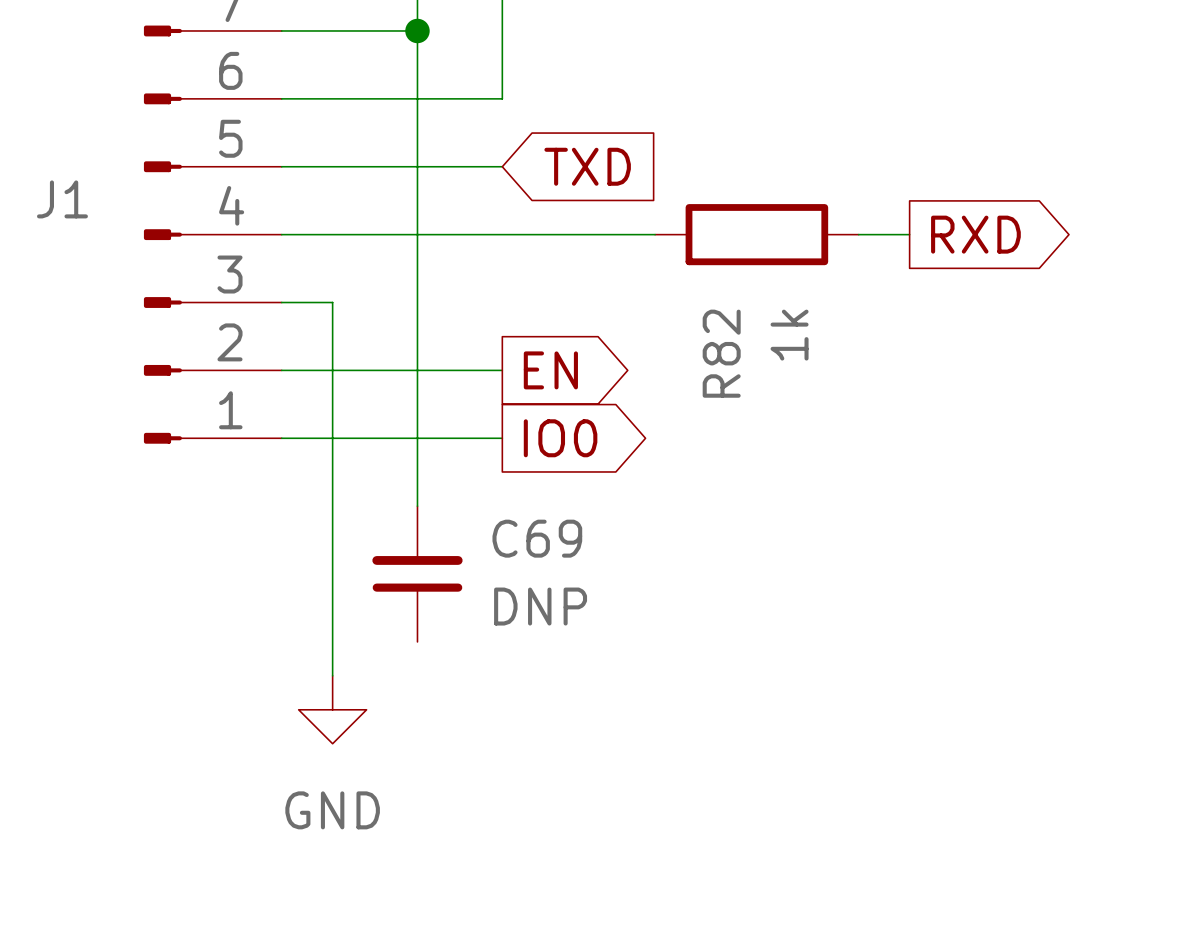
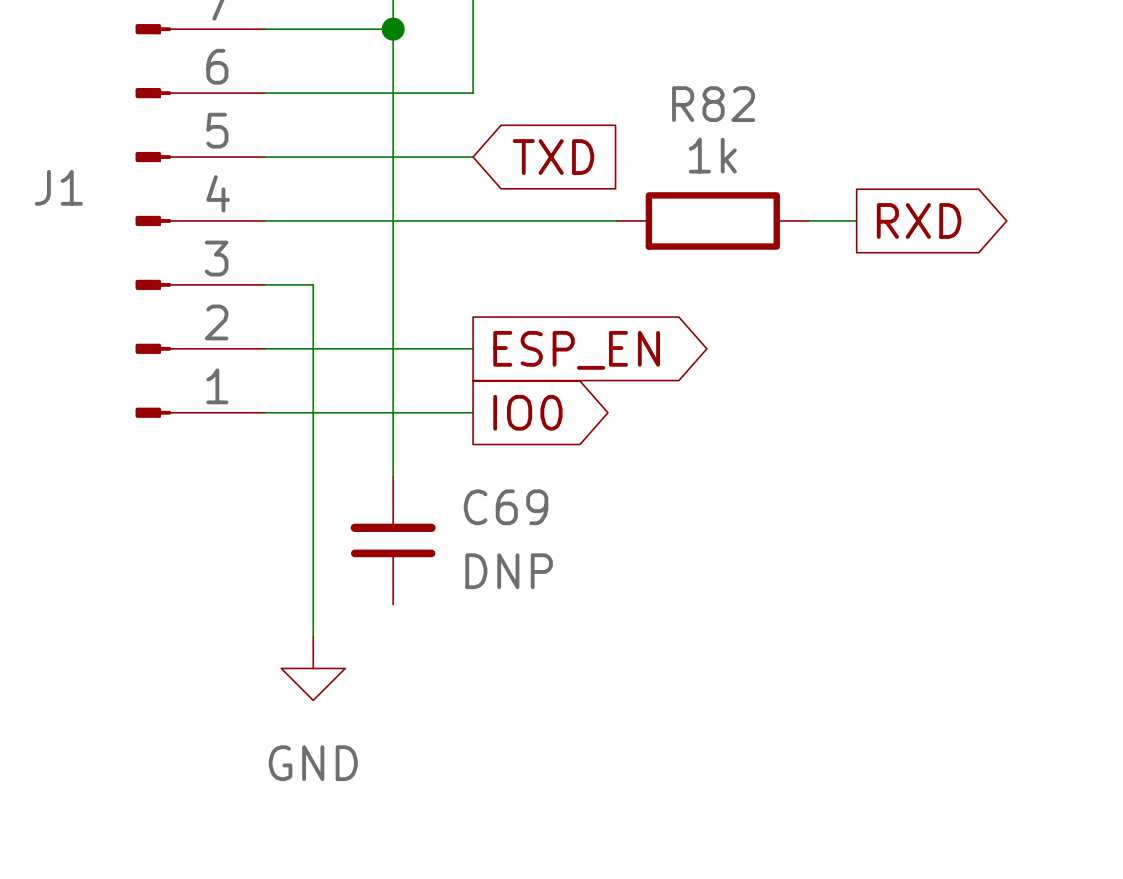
R82 value rotation: 0° (789, 335) -> 90° clockwise (712, 155)
R82 value position: 1k (789, 335) -> 1k (712, 155)
R82 name rotation: 0° (721, 353) -> 90° clockwise (713, 104)
R82 name position: R82 (721, 353) -> R82 (713, 104)
global label: EN (550, 370) -> ESP_EN (576, 350)

